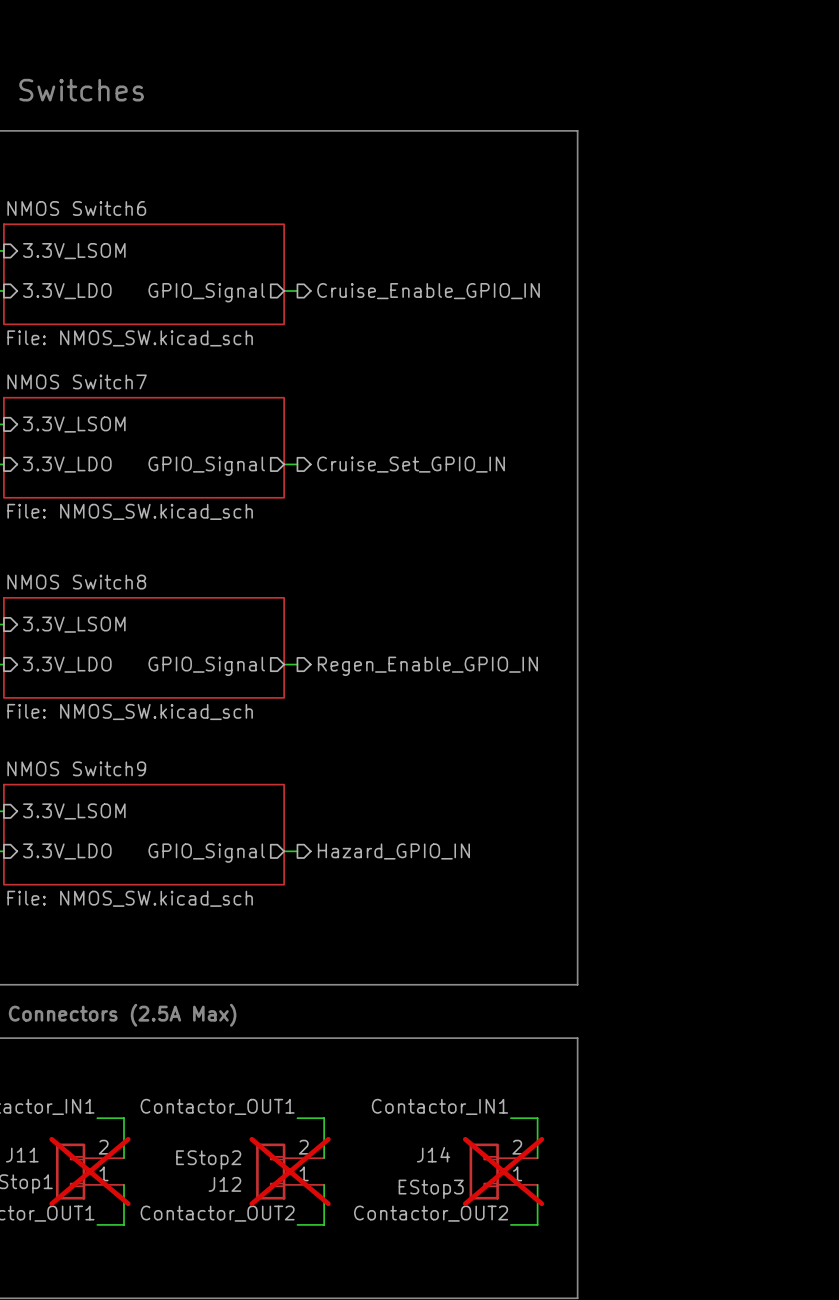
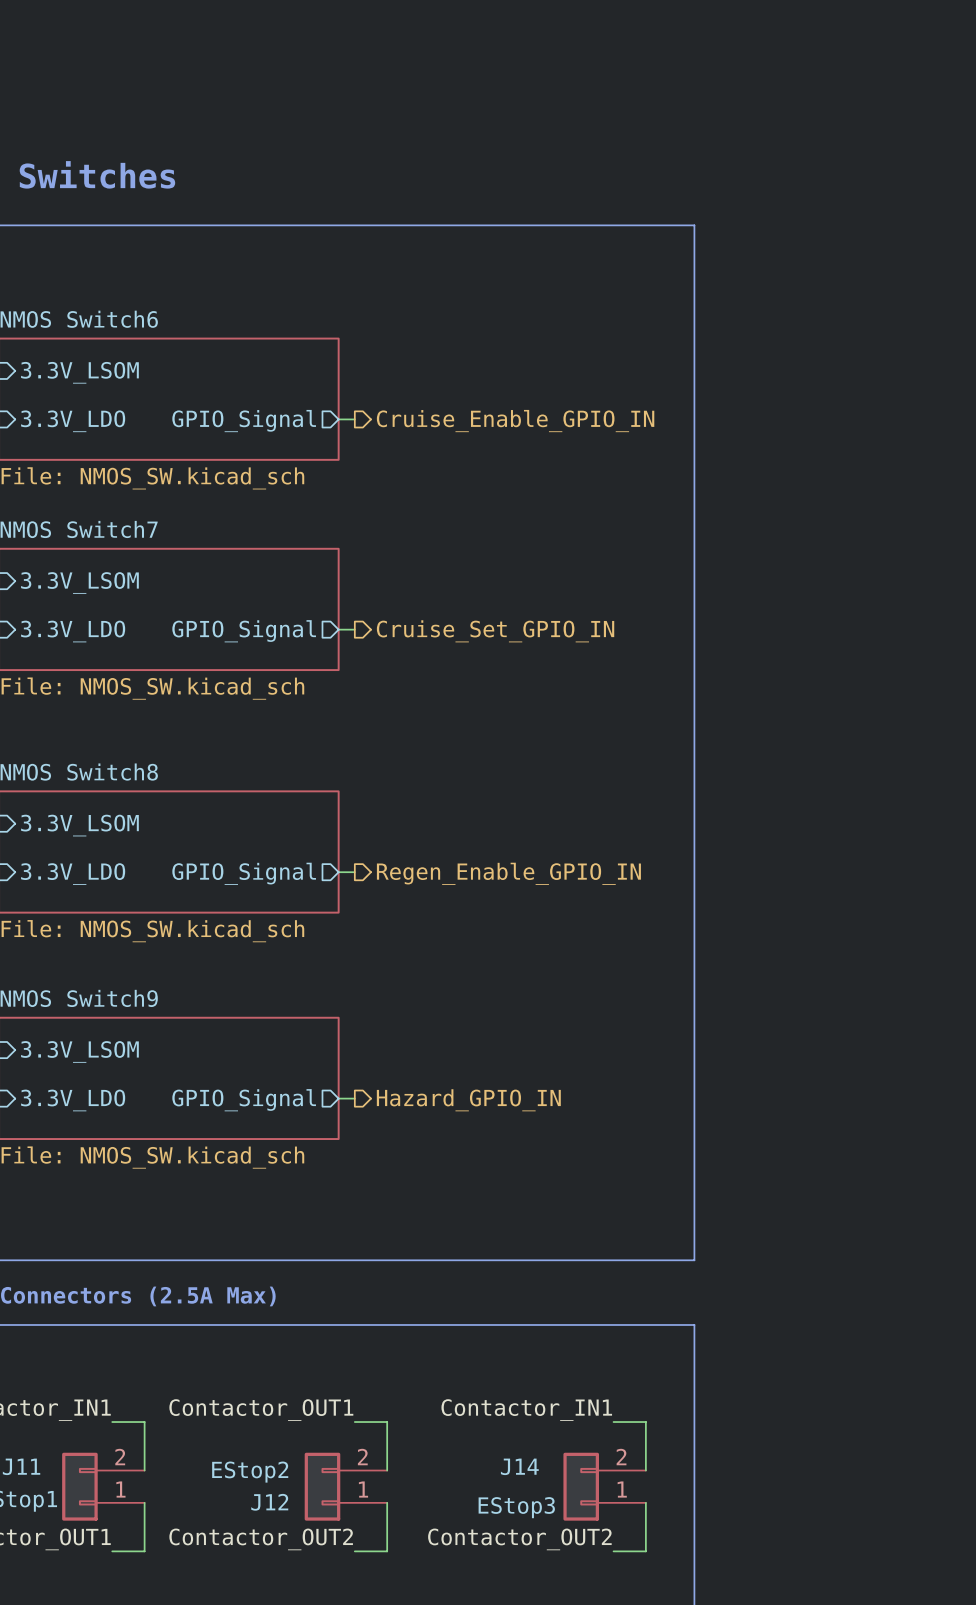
J11 do-not-place cross: (89, 1171) -> none
J12 do-not-place cross: (290, 1171) -> none
J14 do-not-place cross: (503, 1171) -> none

